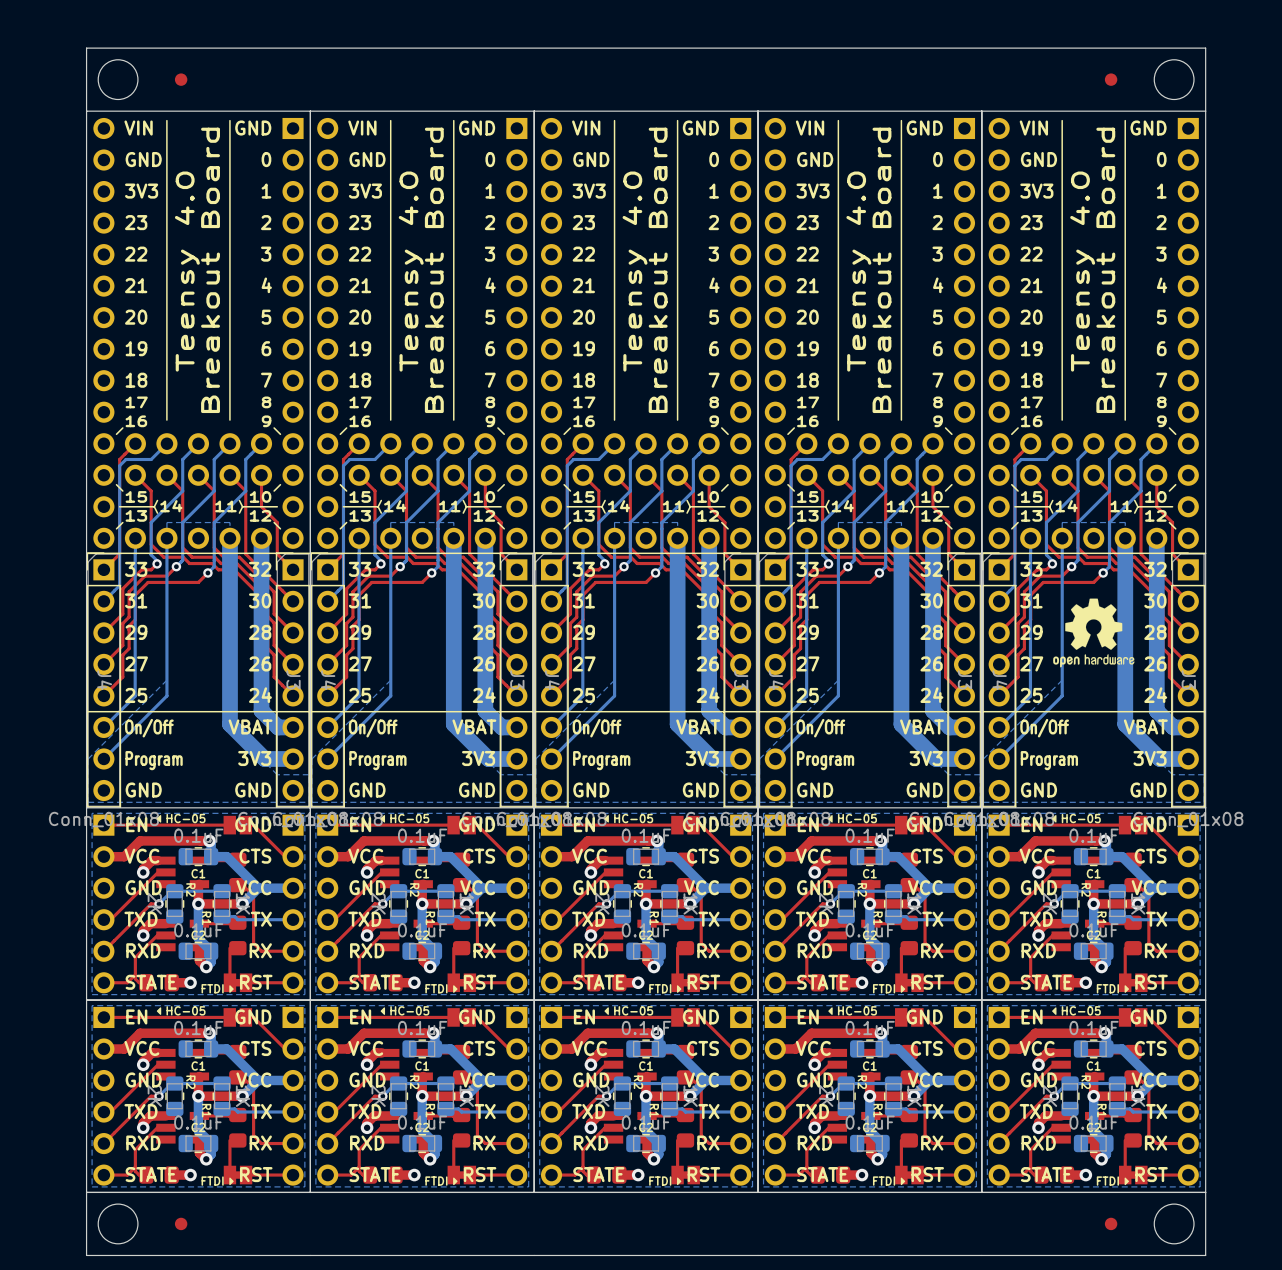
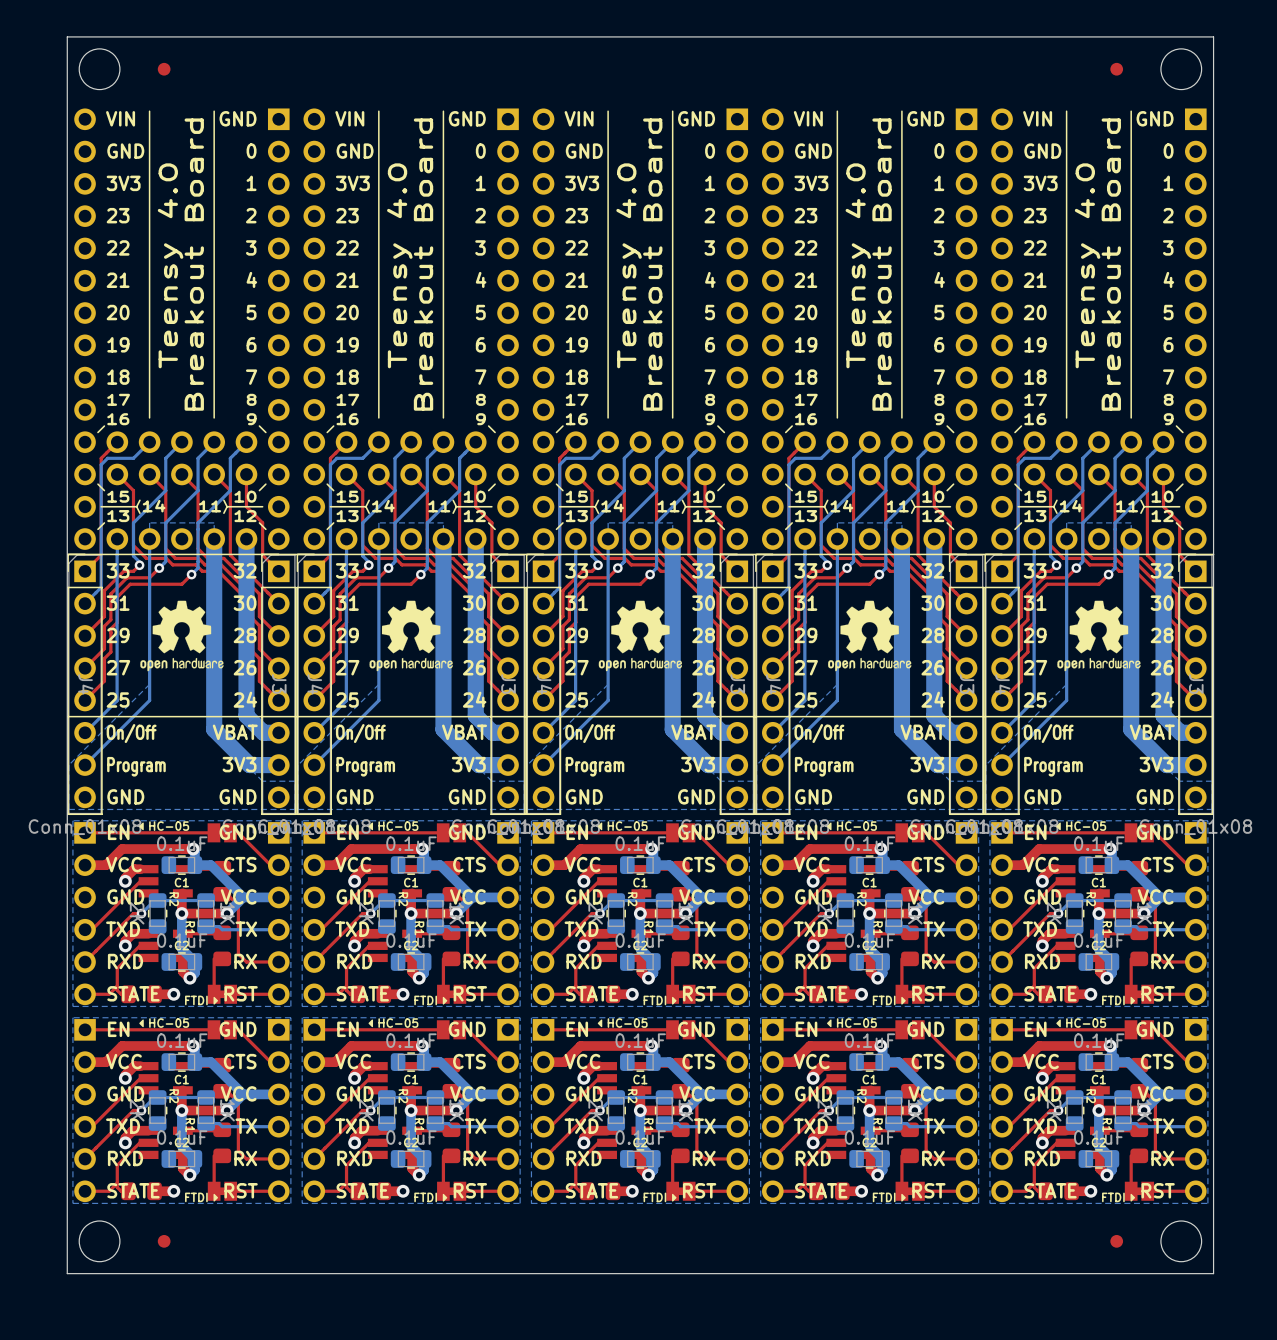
board edge: (310, 111) (310, 1192) (310, 1000) (310, 807) -> none
board edge: (534, 111) (534, 1192) (534, 807) -> none
board edge: (758, 111) (758, 1192) (758, 1000) (758, 807) -> none
board edge: (981, 111) (981, 1192) (981, 807) -> none
board edge: (1205, 111) (86, 111) -> none
drawing: none -> [140, 600, 224, 672]
drawing: none -> [369, 600, 453, 672]
drawing: none -> [598, 600, 683, 672]
drawing: none -> [828, 600, 912, 672]
board edge: (1205, 807) (86, 807) -> none
board edge: (1205, 1000) (86, 1000) -> none
board edge: (1205, 1192) (86, 1192) -> none

